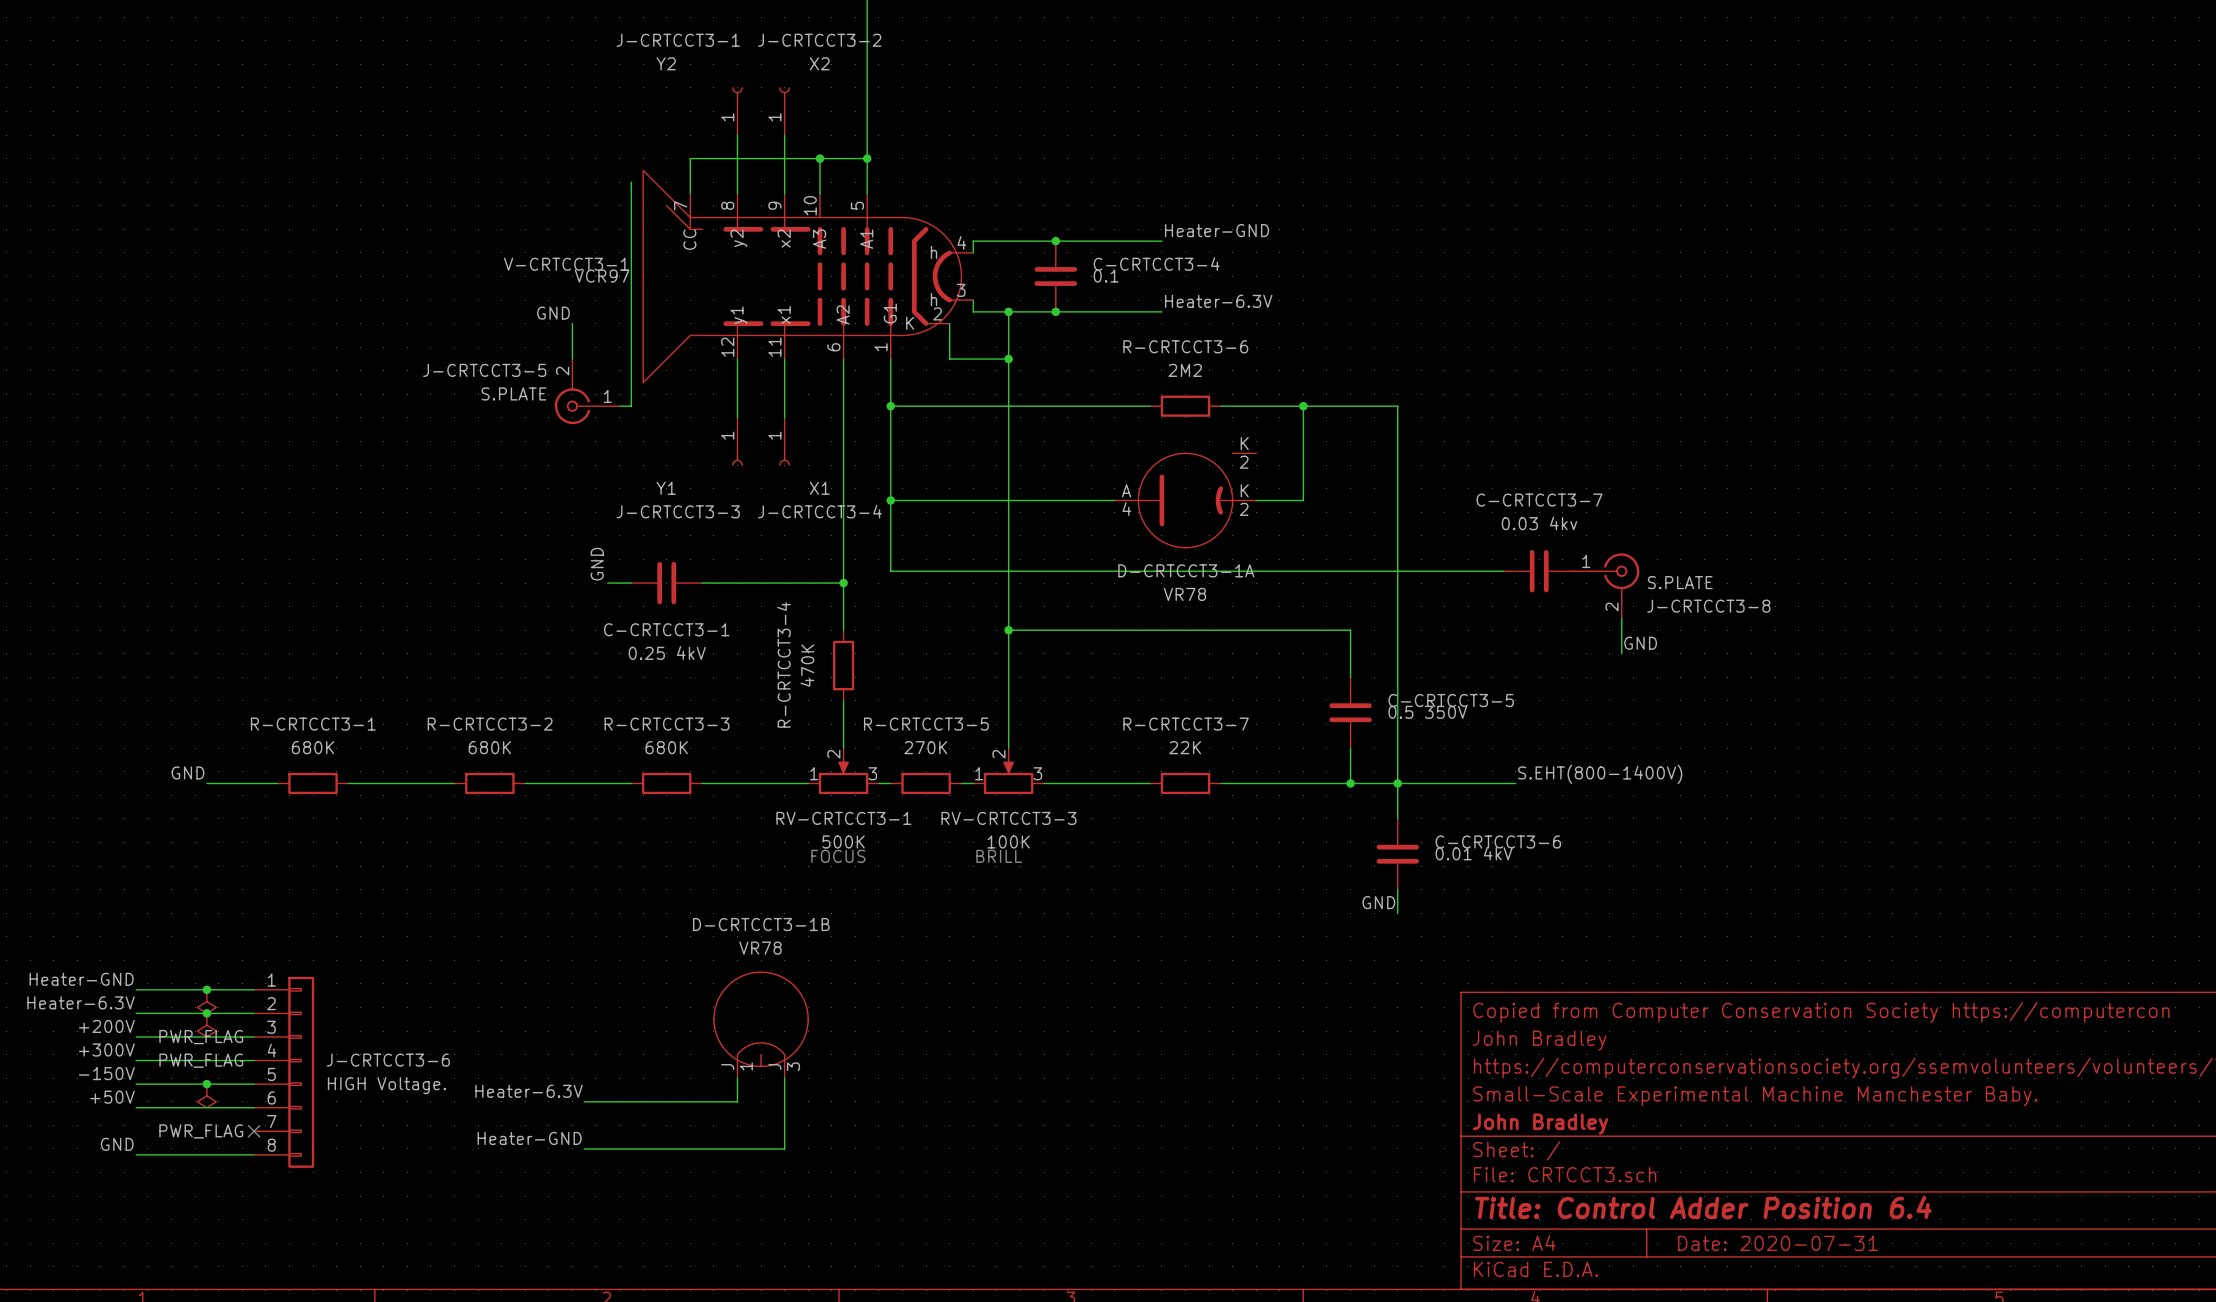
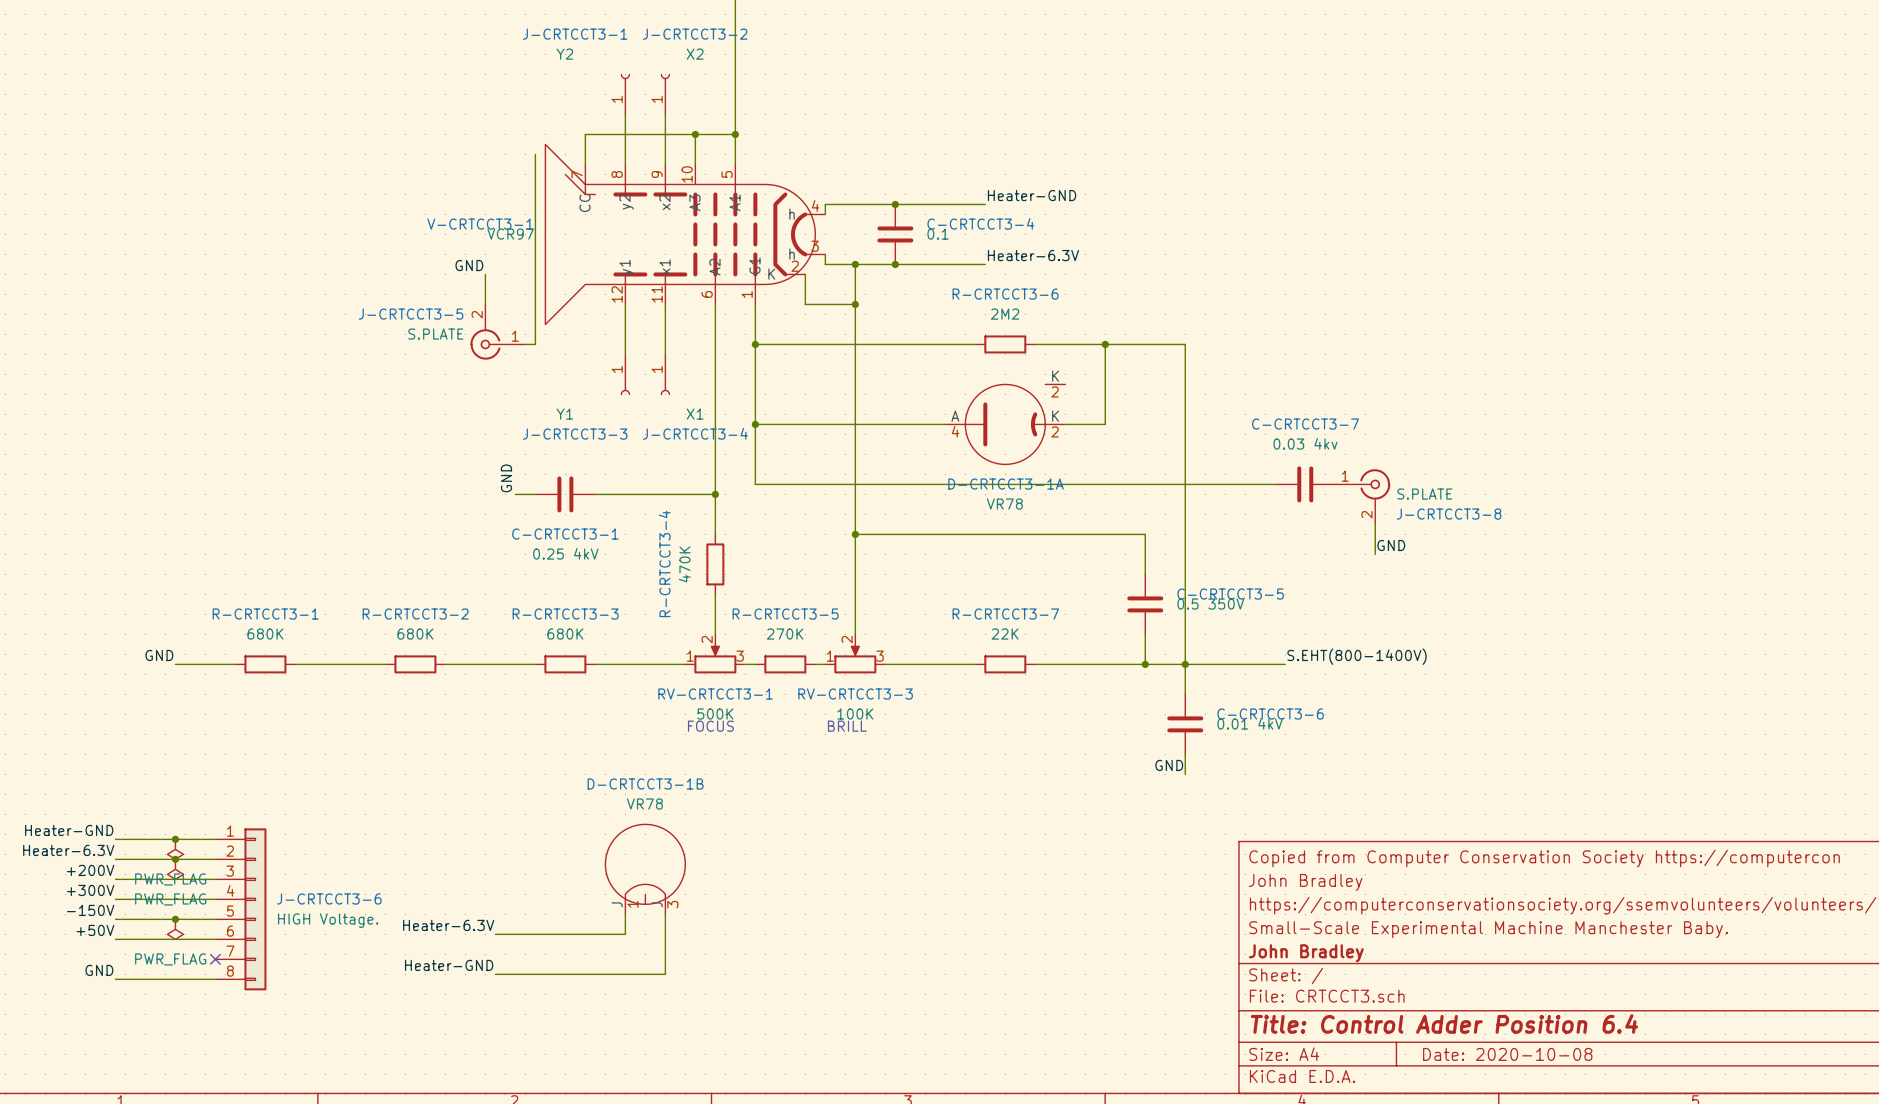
title block: Date: 2020-07-31 (1777, 1243) -> Date: 2020-10-08 (1507, 1054)

